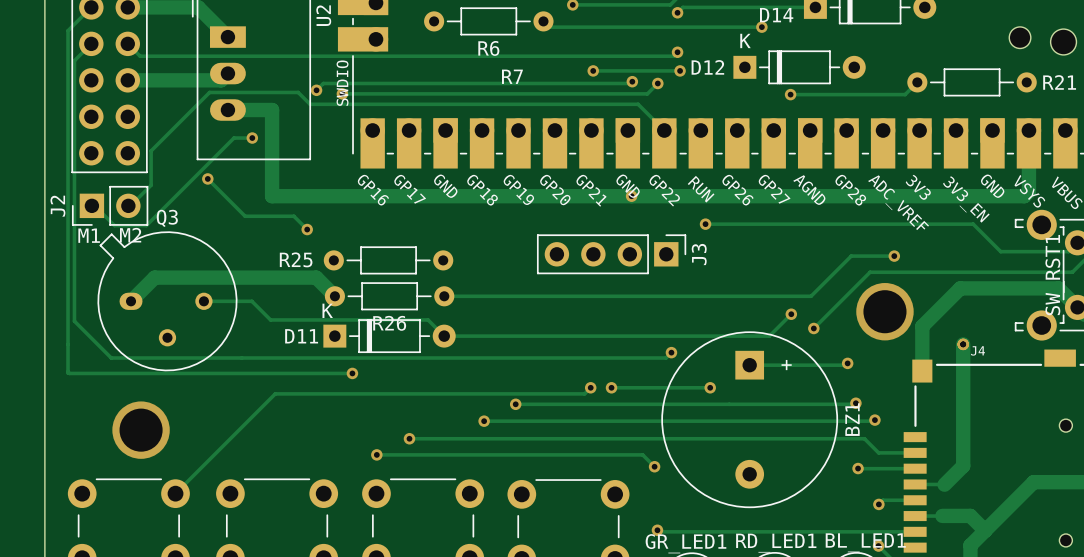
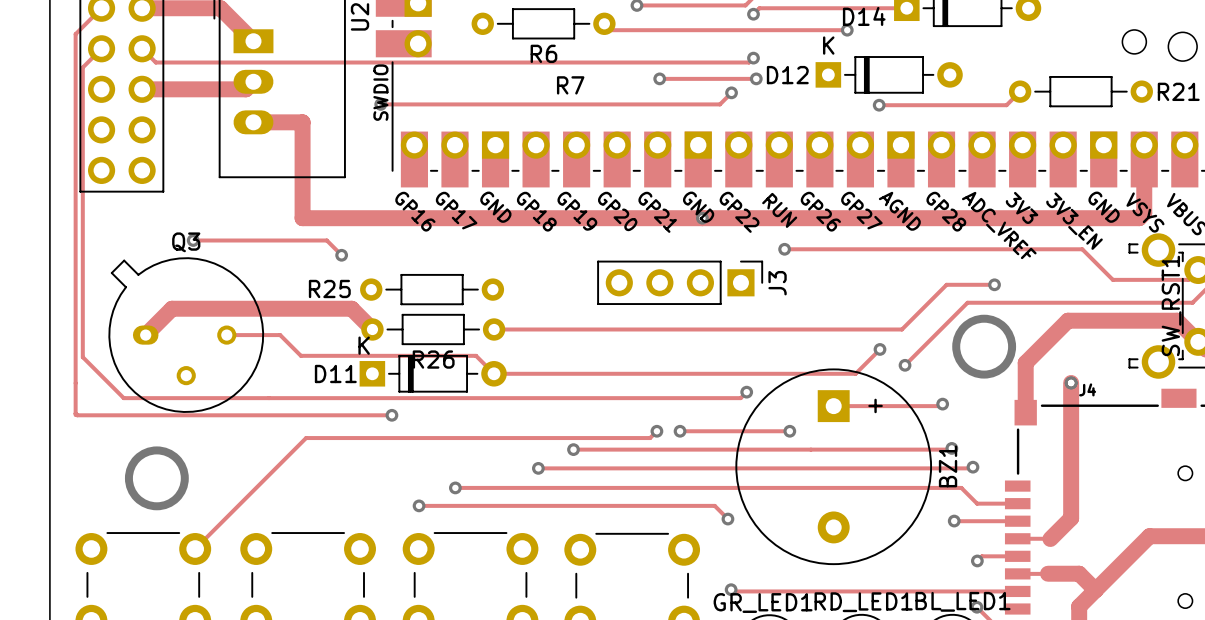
track: (632, 81) (630, 83) (323, 83) (316, 90) -> none
via: (632, 81) -> none
via: (316, 90) -> none
track: (664, 130) (638, 104) (310, 104) (298, 92) (209, 92) (151, 150) (151, 185) (130, 205) -> none
track: (252, 138) (234, 138) (146, 225) (114, 225) (94, 205) -> none
via: (252, 138) -> none
track: (207, 178) (245, 216) -> (193, 240) (272, 240)
via position: (207, 178) -> (193, 240)
J2: (110, 205) -> none
text: M1 (89, 235) -> none
text: M2 (130, 235) -> none

